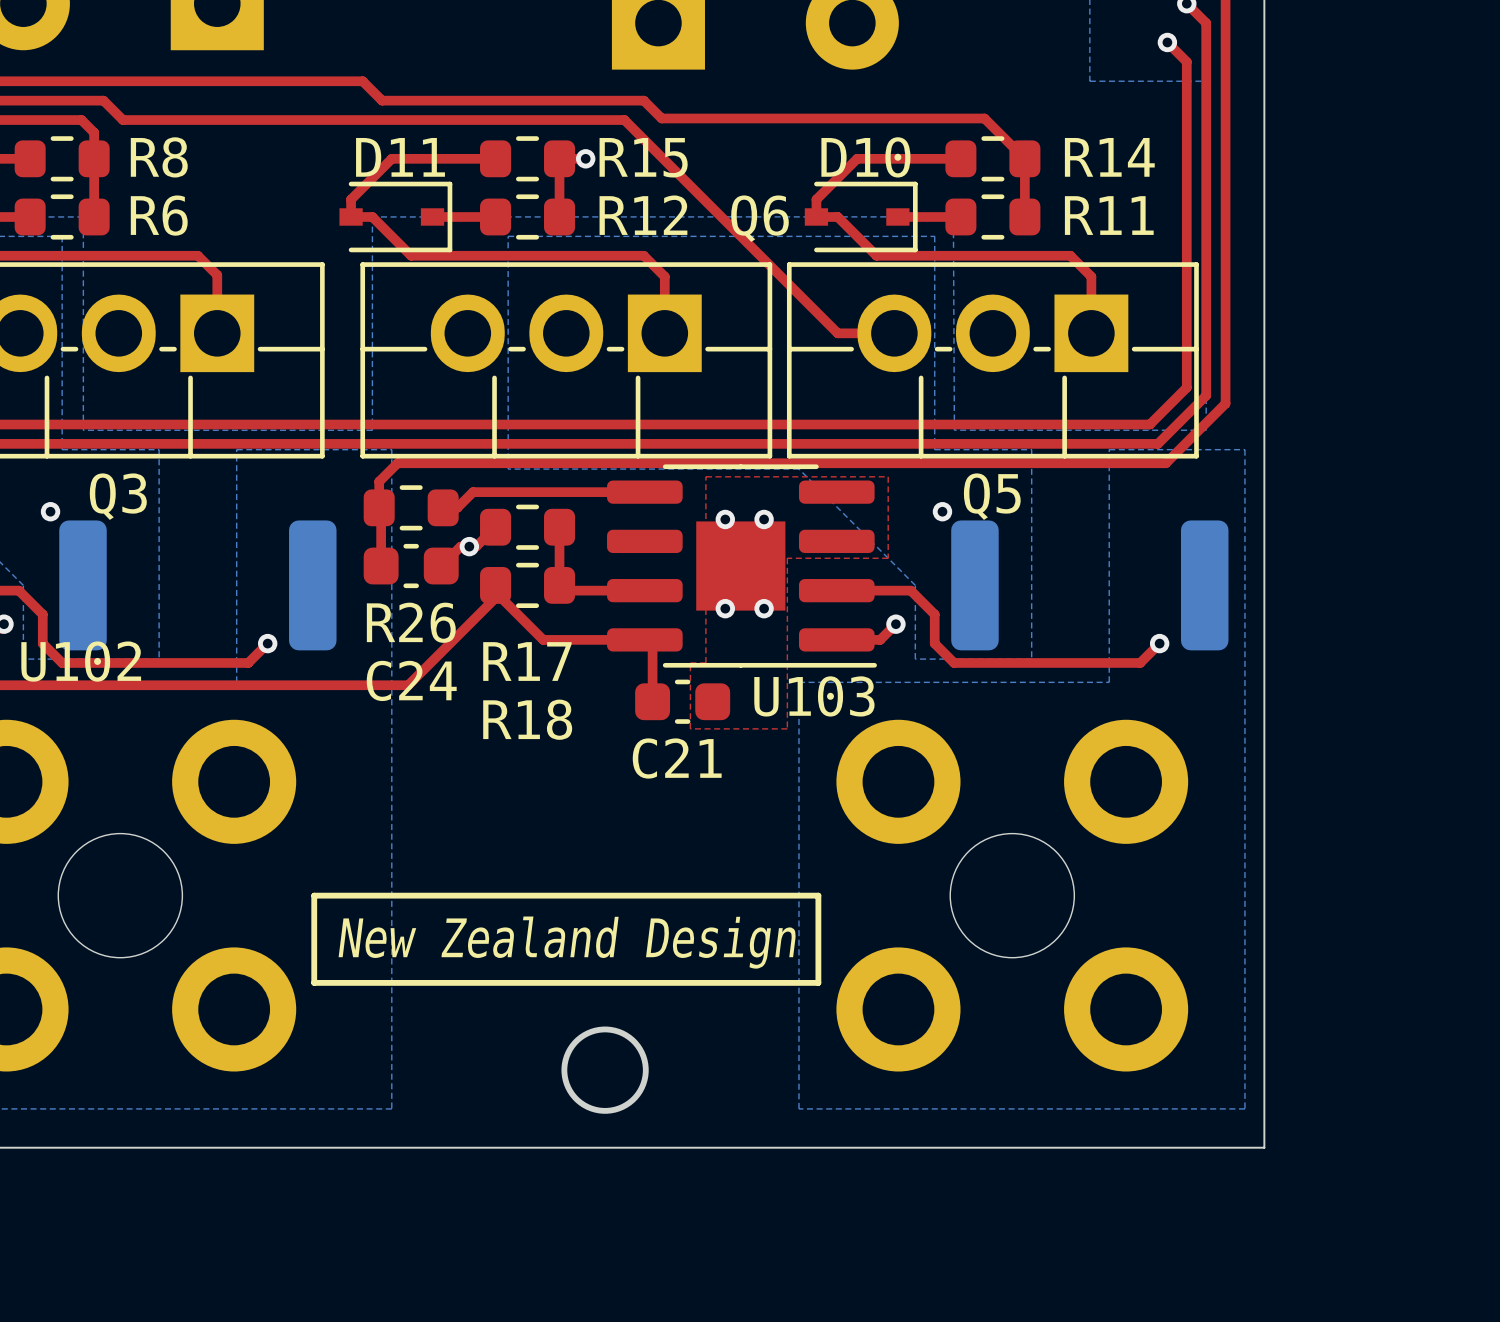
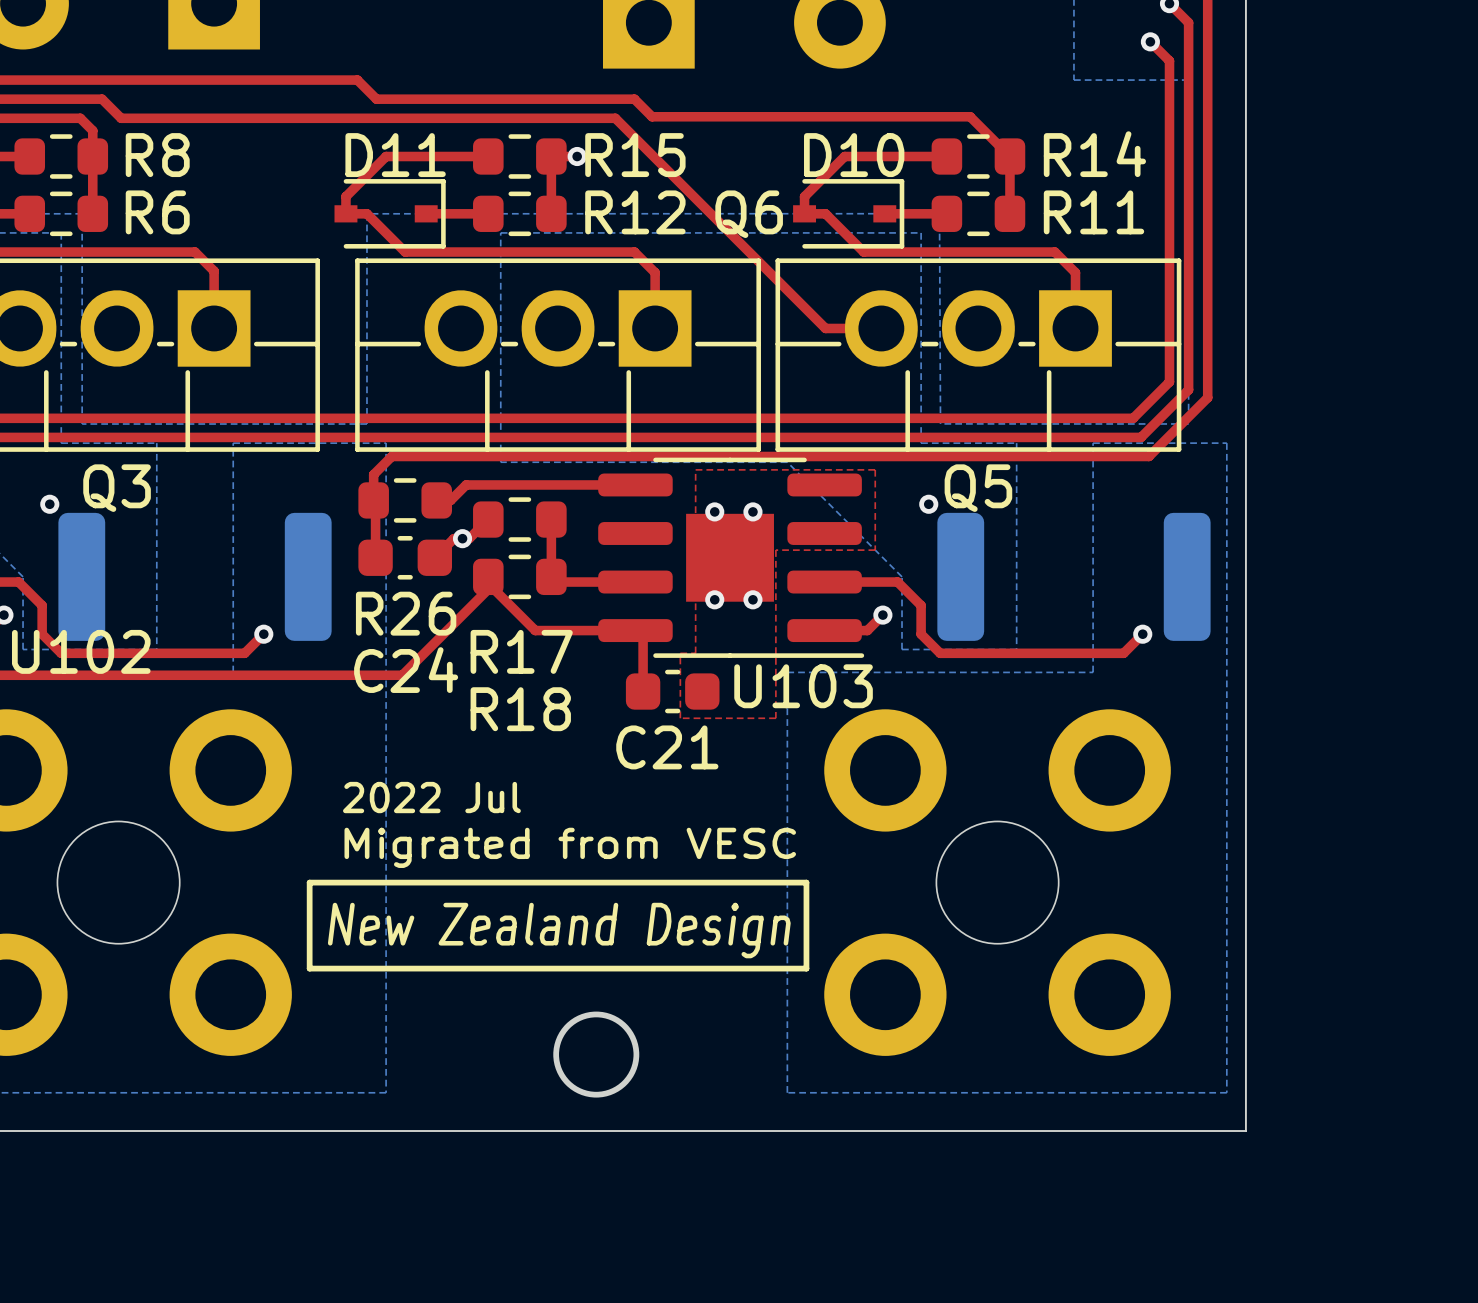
text: none -> 2022 Jul (431, 797)
text: none -> Migrated from VESC (570, 847)

